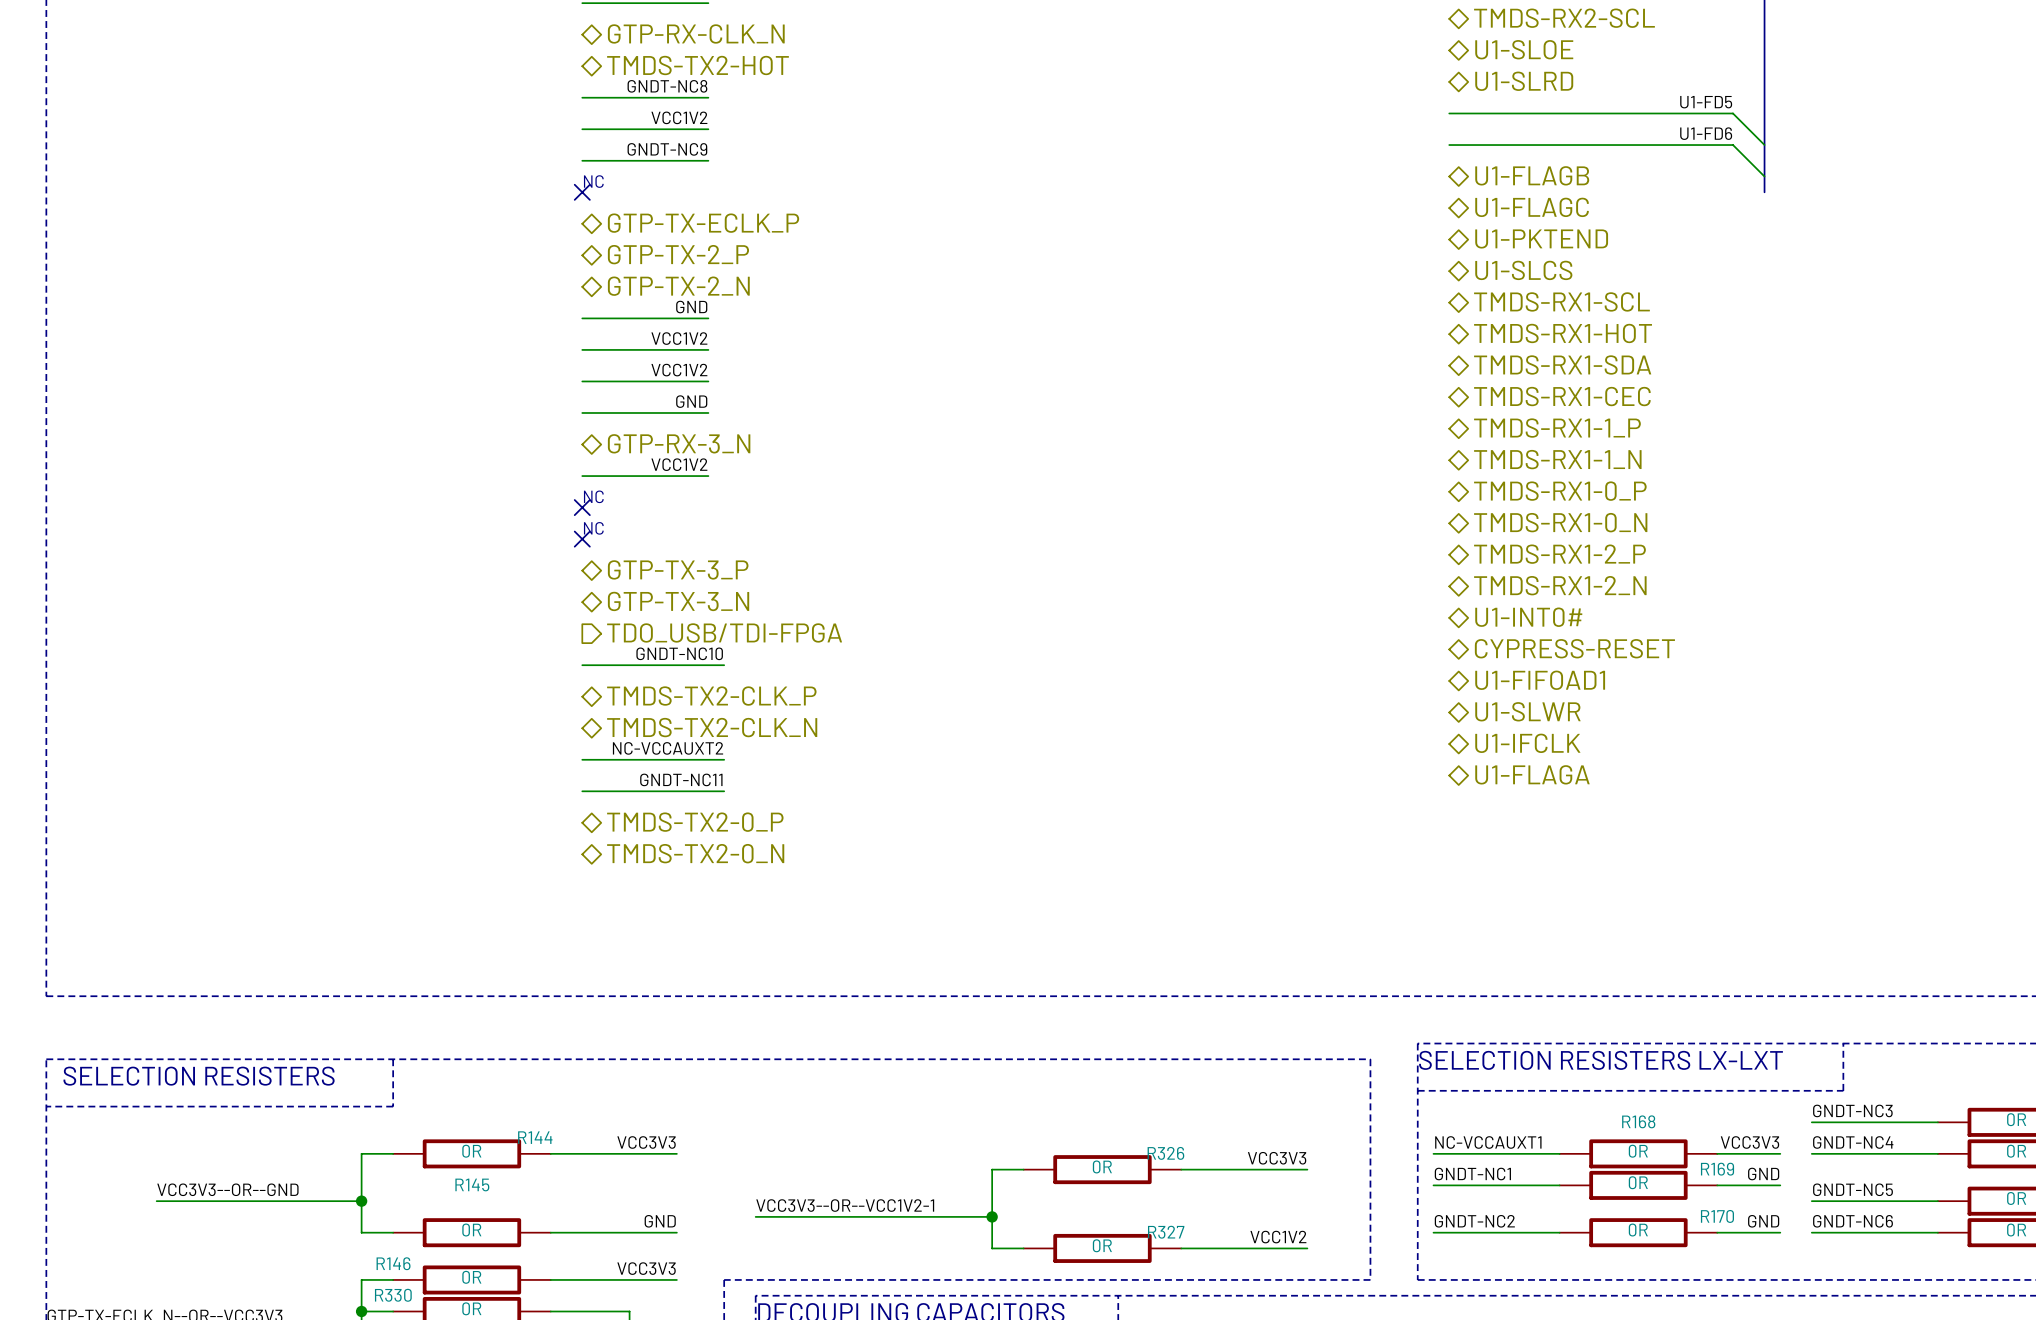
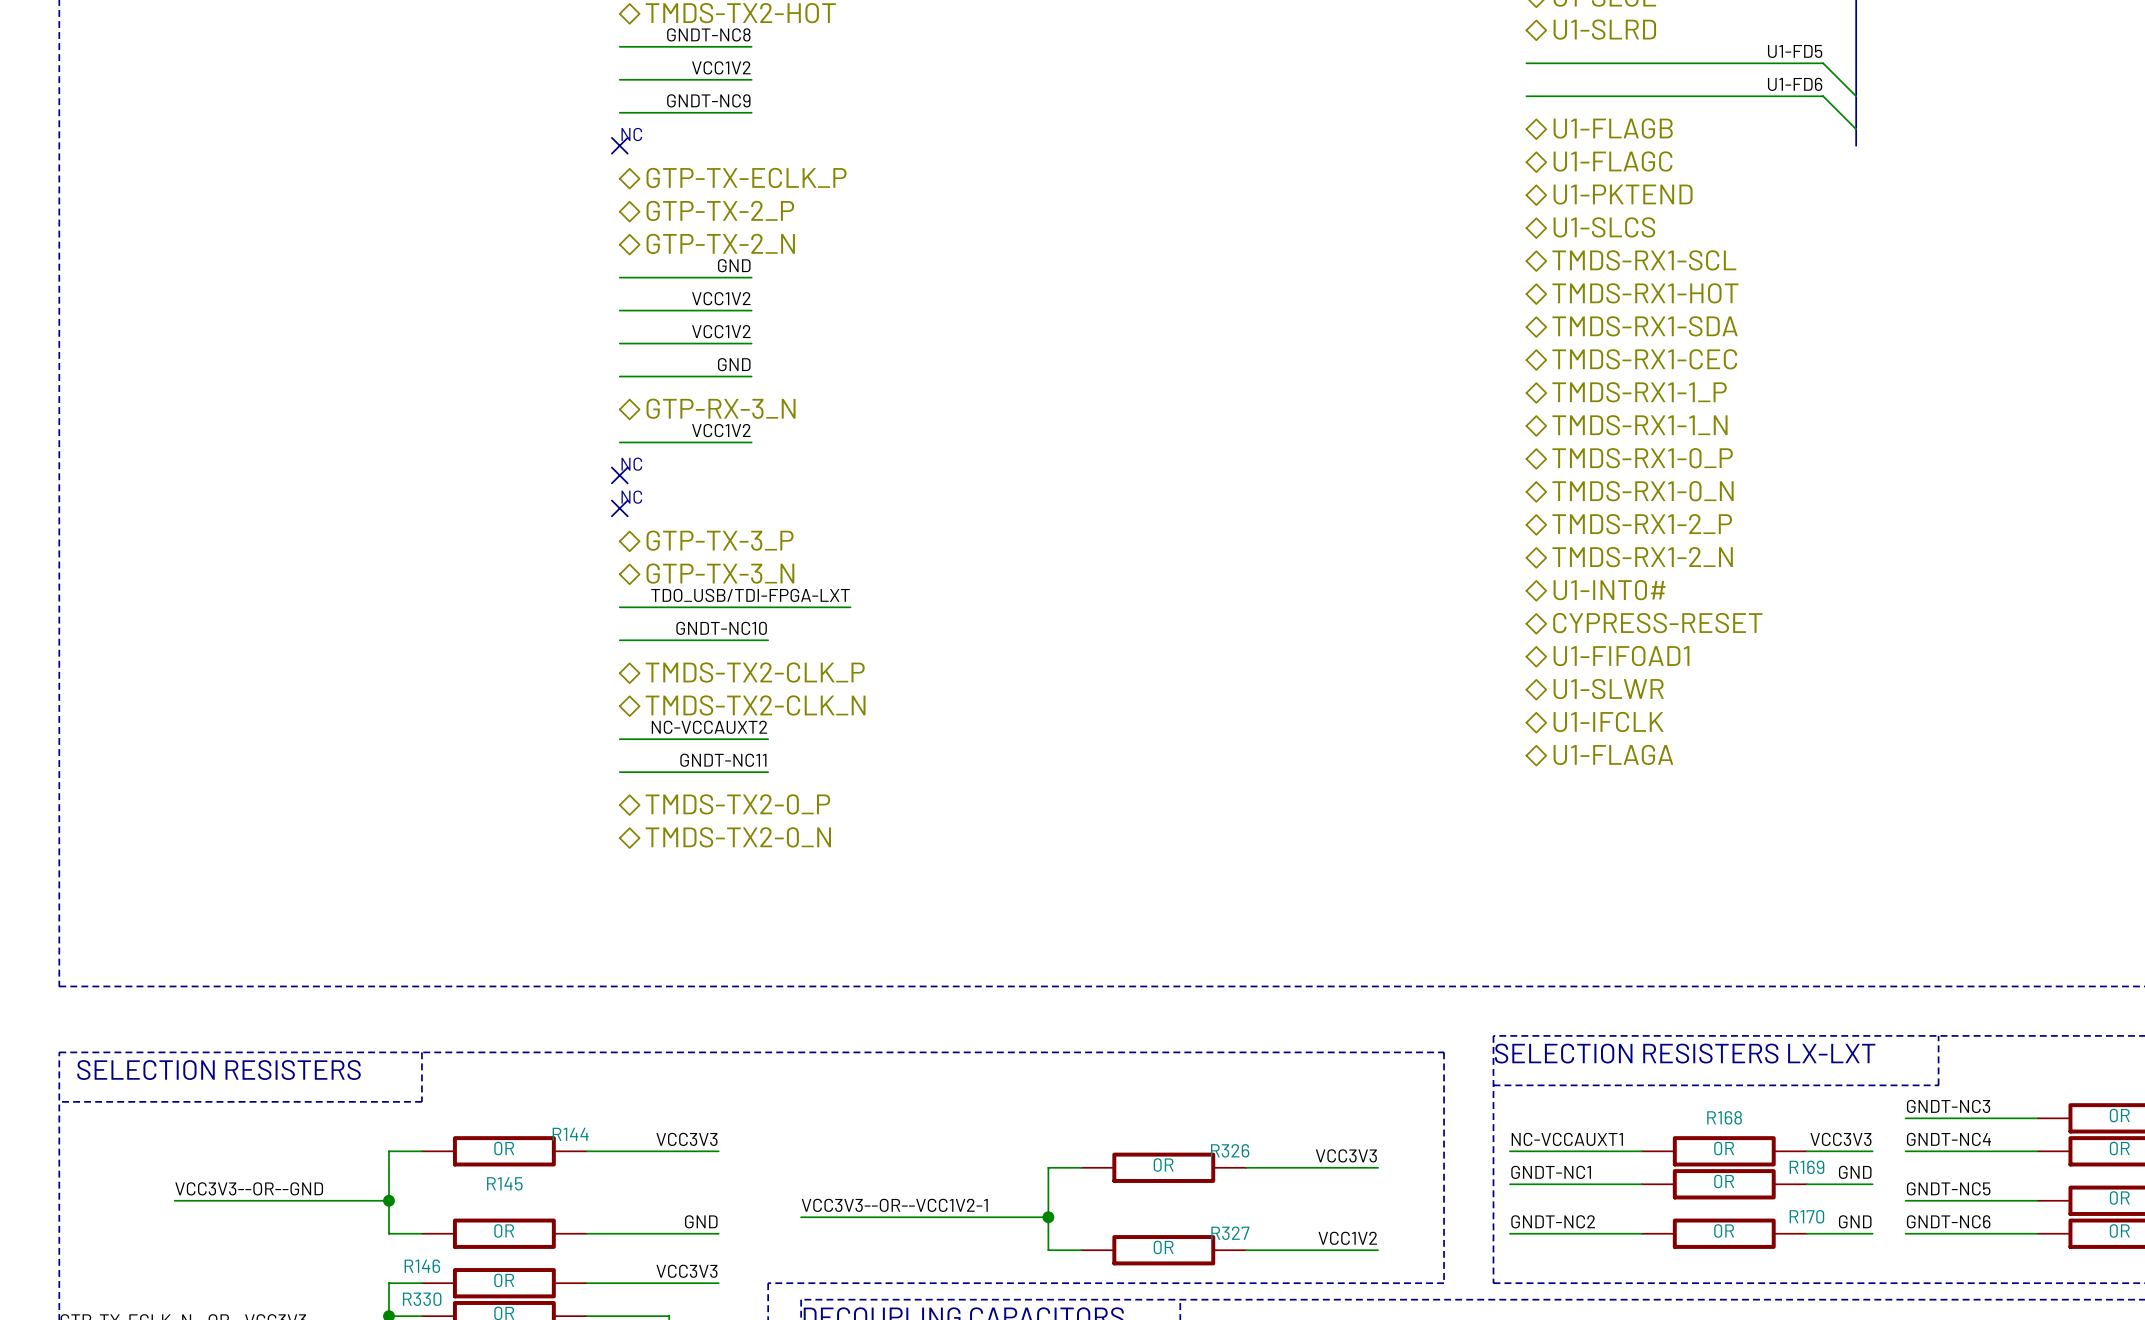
label: none -> TDO_USB/TDI-FPGA-LXT (750, 595)
hierarchical label: TDO_USB/TDI-FPGA (724, 632) -> none
wire: none -> (619, 607) (850, 607)

